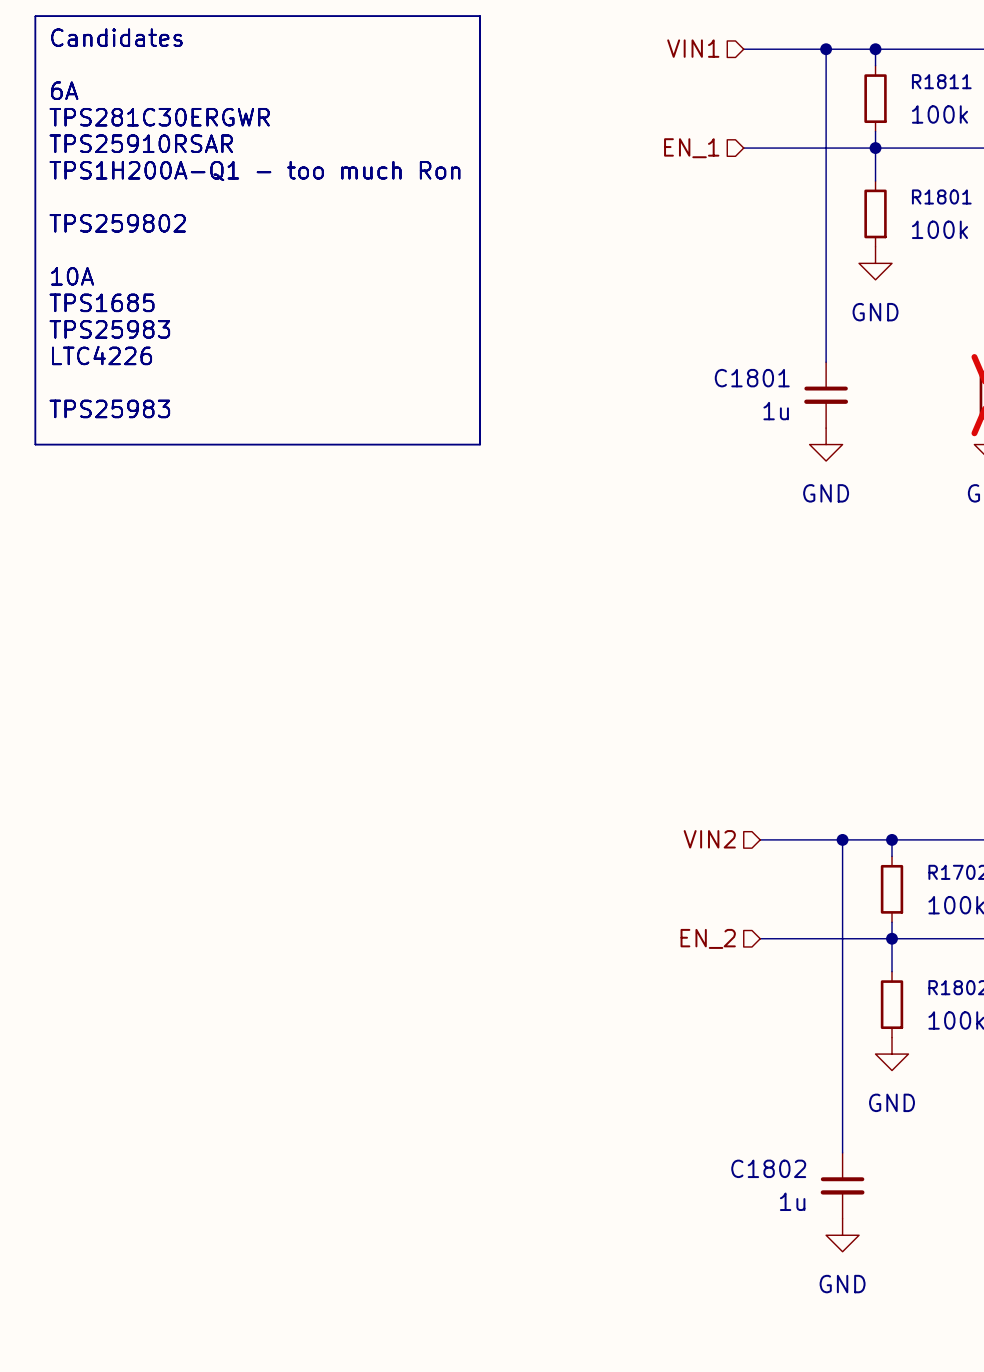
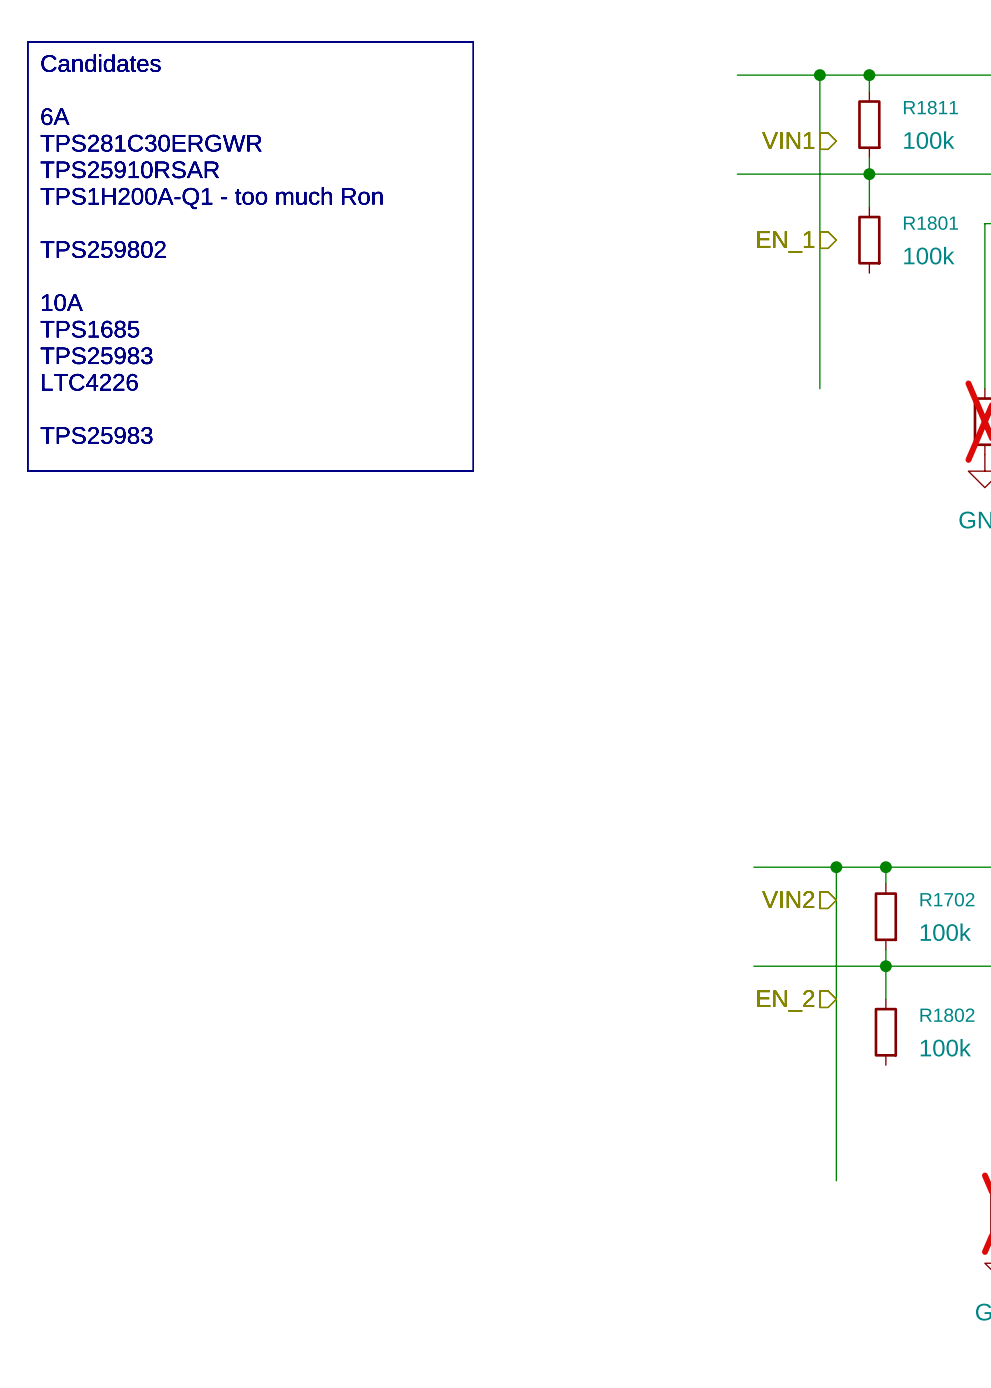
hierarchical label position: VIN1 (693, 48) -> VIN1 (788, 140)
hierarchical label position: EN_1 (691, 148) -> EN_1 (785, 241)
power symbol: GND (875, 263) -> none
C1801: 1u (826, 395) -> none
power symbol: GND (826, 444) -> none
hierarchical label position: VIN2 (709, 839) -> VIN2 (788, 899)
hierarchical label position: EN_2 (708, 938) -> EN_2 (785, 1000)
power symbol: GND (892, 1054) -> none
C1802: 1u (842, 1185) -> none
power symbol: GND (842, 1235) -> none

